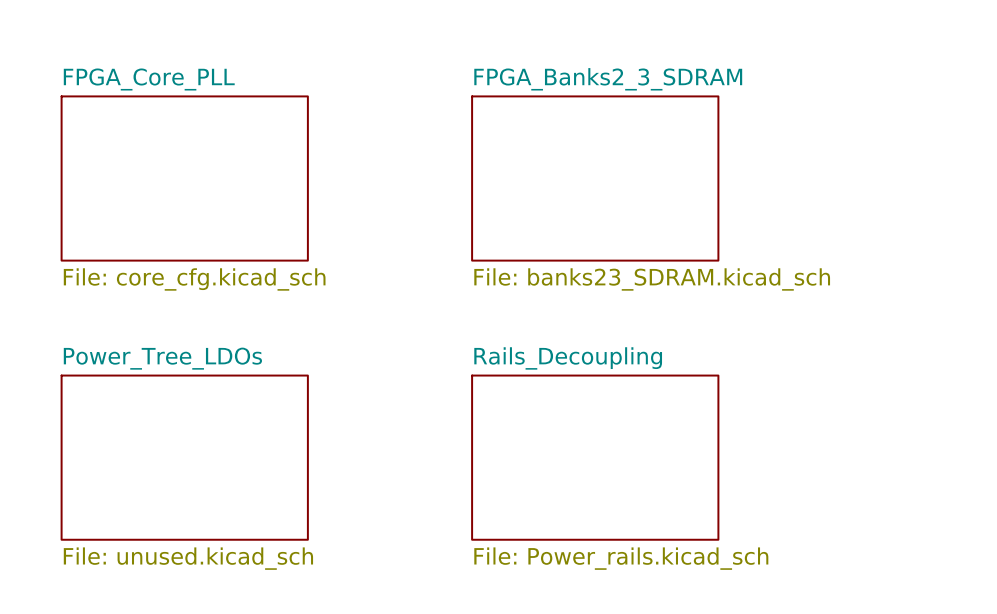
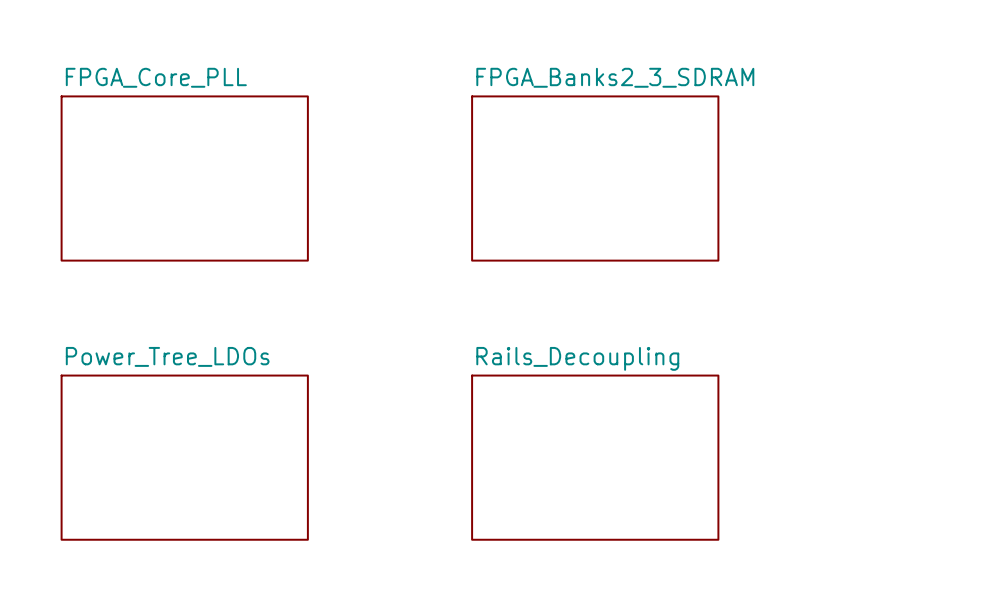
sheet FPGA_Core_PLL value: File: core_cfg.kicad_sch (194, 279) -> none
sheet FPGA_Banks2_3_SDRAM value: File: banks23_SDRAM.kicad_sch (652, 279) -> none
sheet Power_Tree_LDOs value: File: unused.kicad_sch (188, 558) -> none
sheet Rails_Decoupling value: File: Power_rails.kicad_sch (621, 558) -> none

